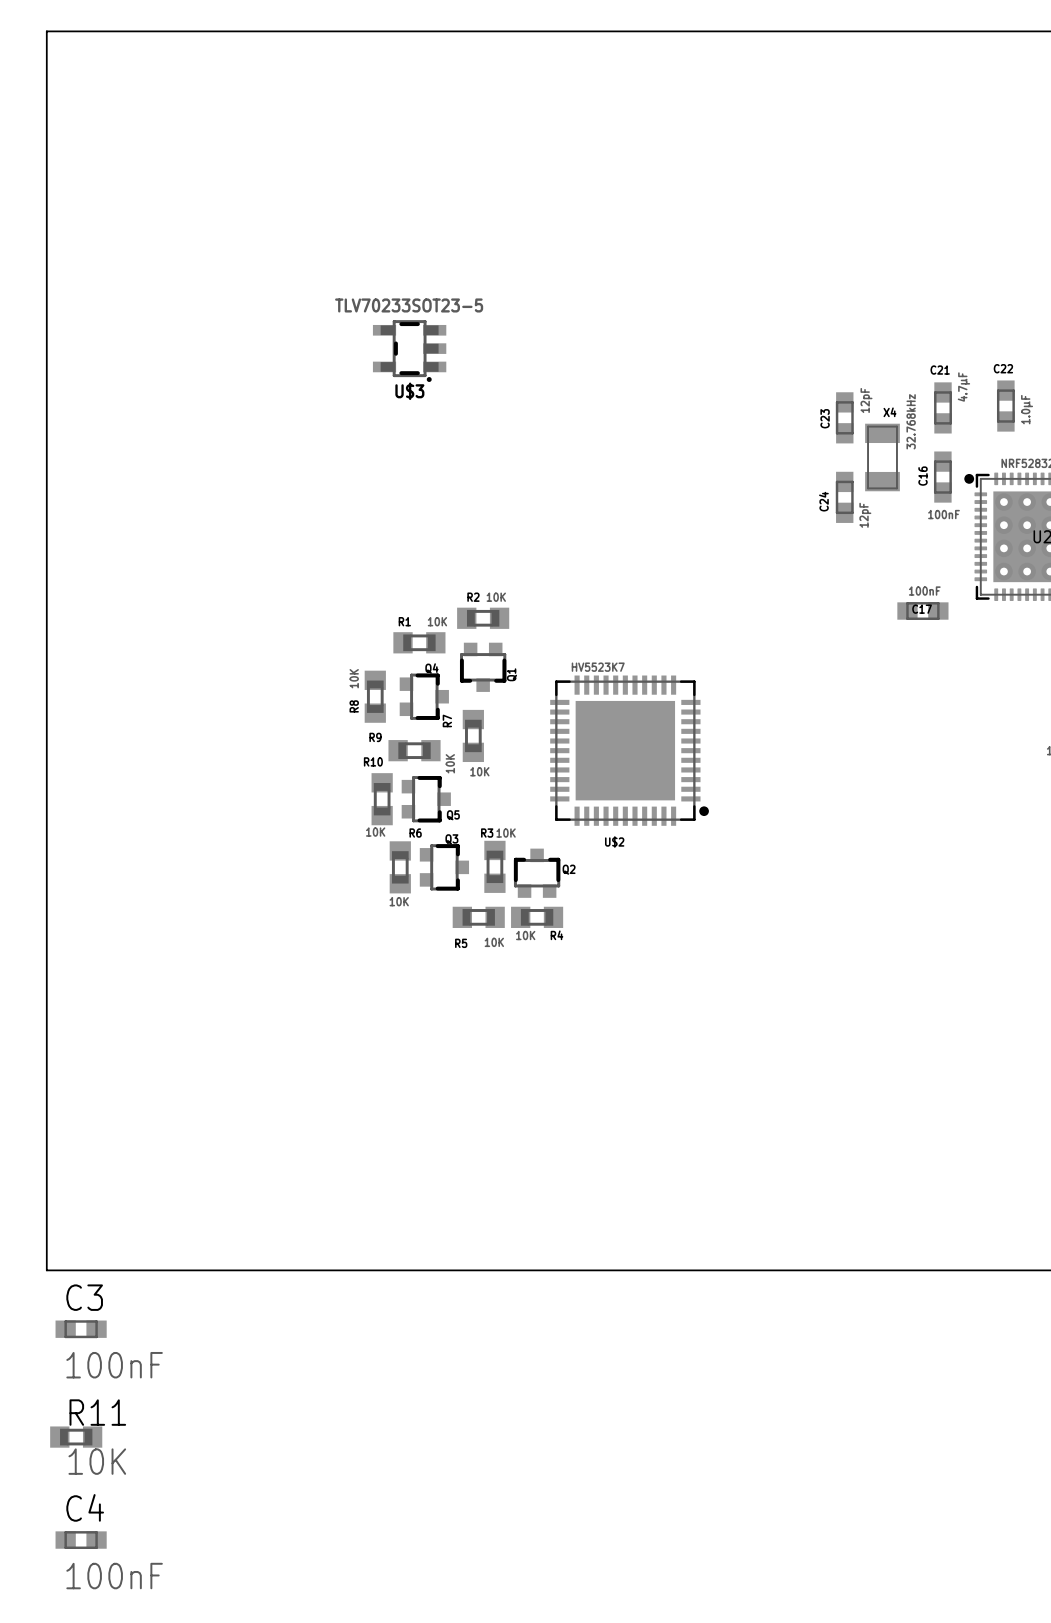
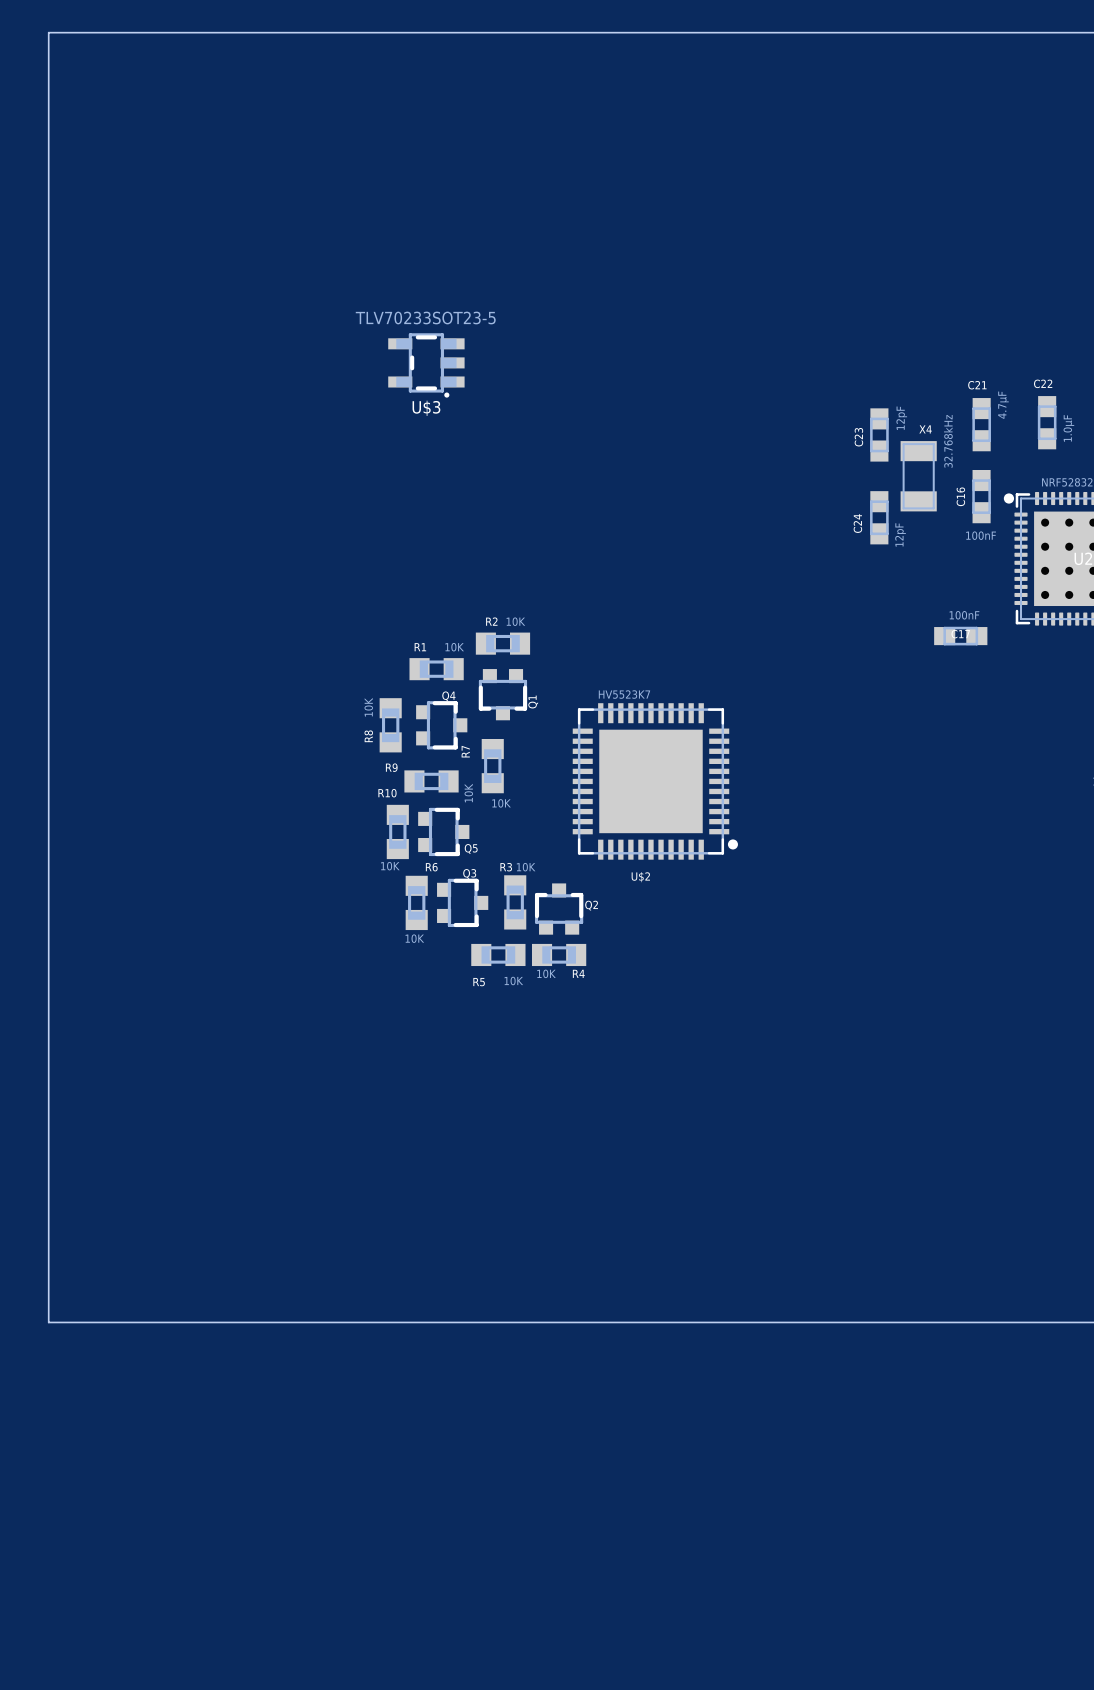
C3: 100nF (81, 1329) -> none
R11: 10K (76, 1437) -> none
C4: 100nF (81, 1540) -> none

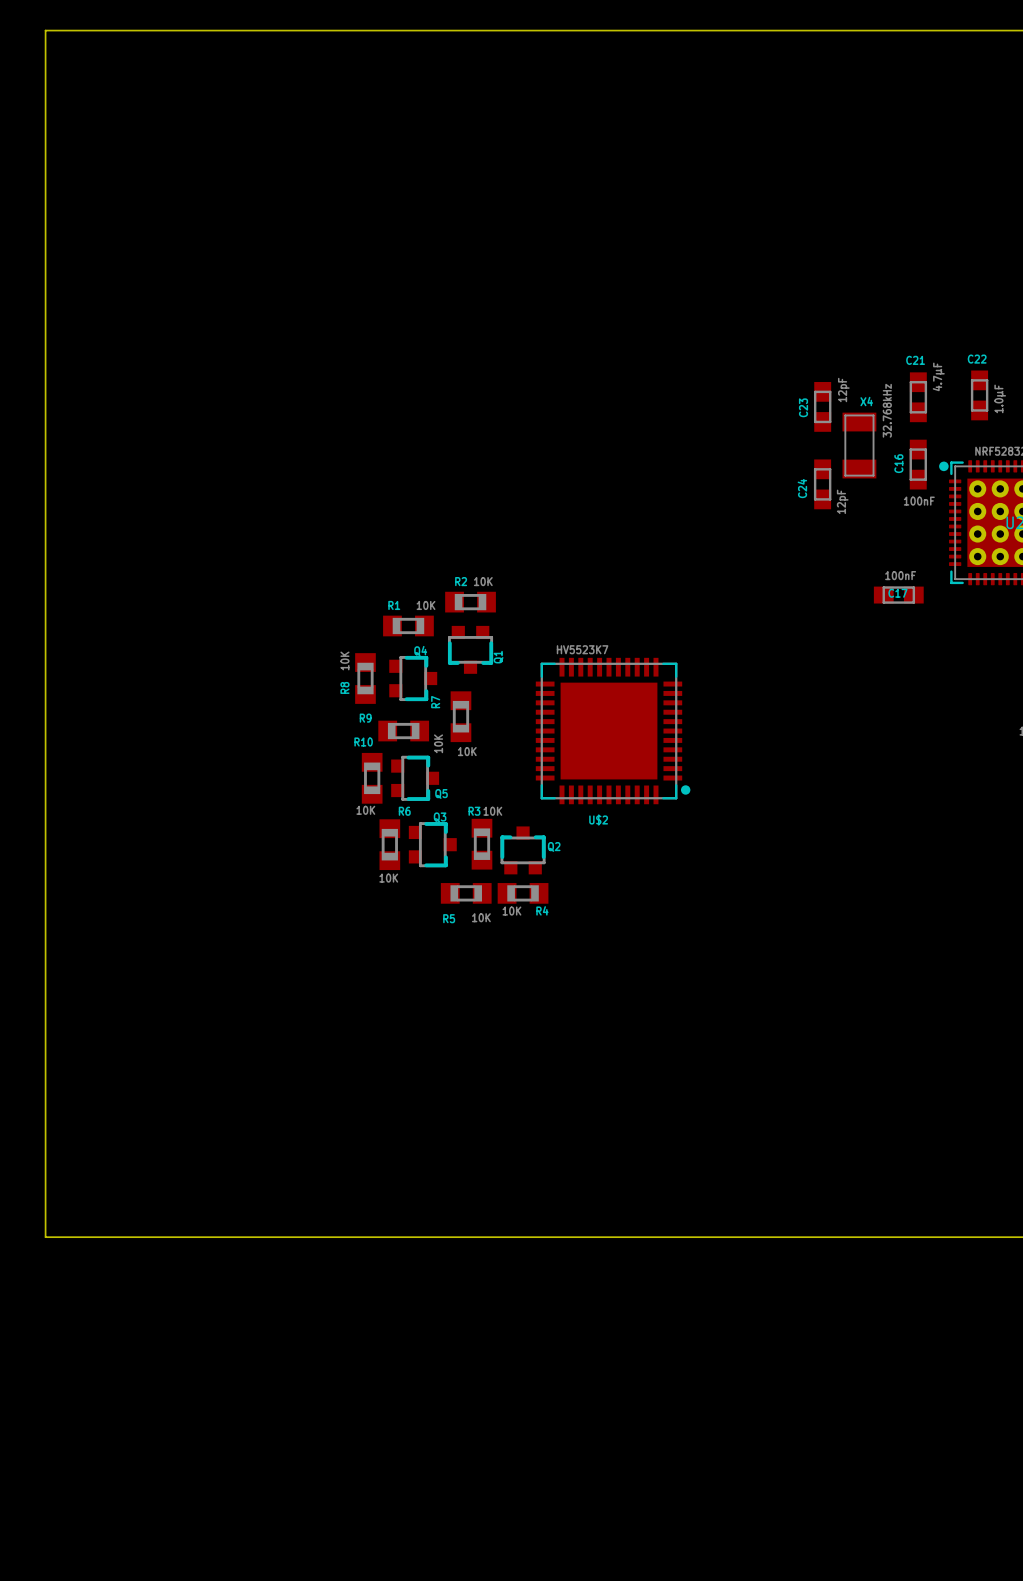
U$3: TLV70233SOT23-5 (426, 365) -> none

